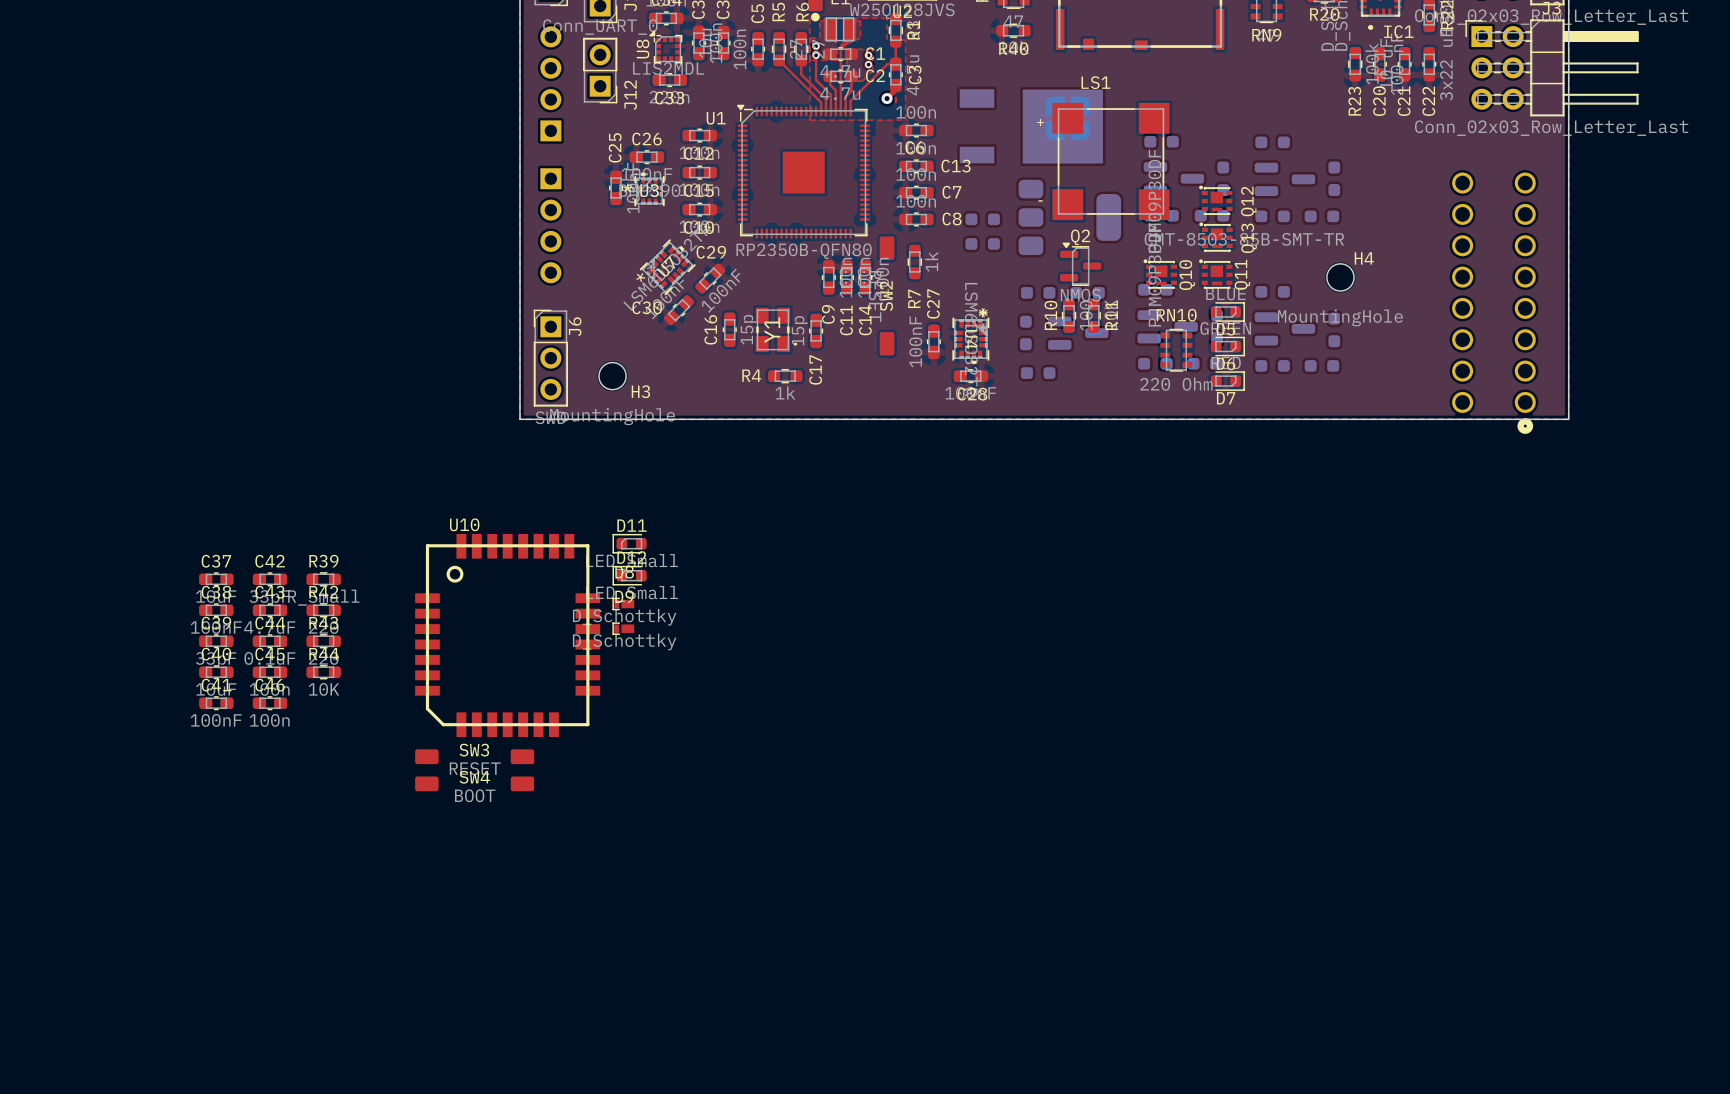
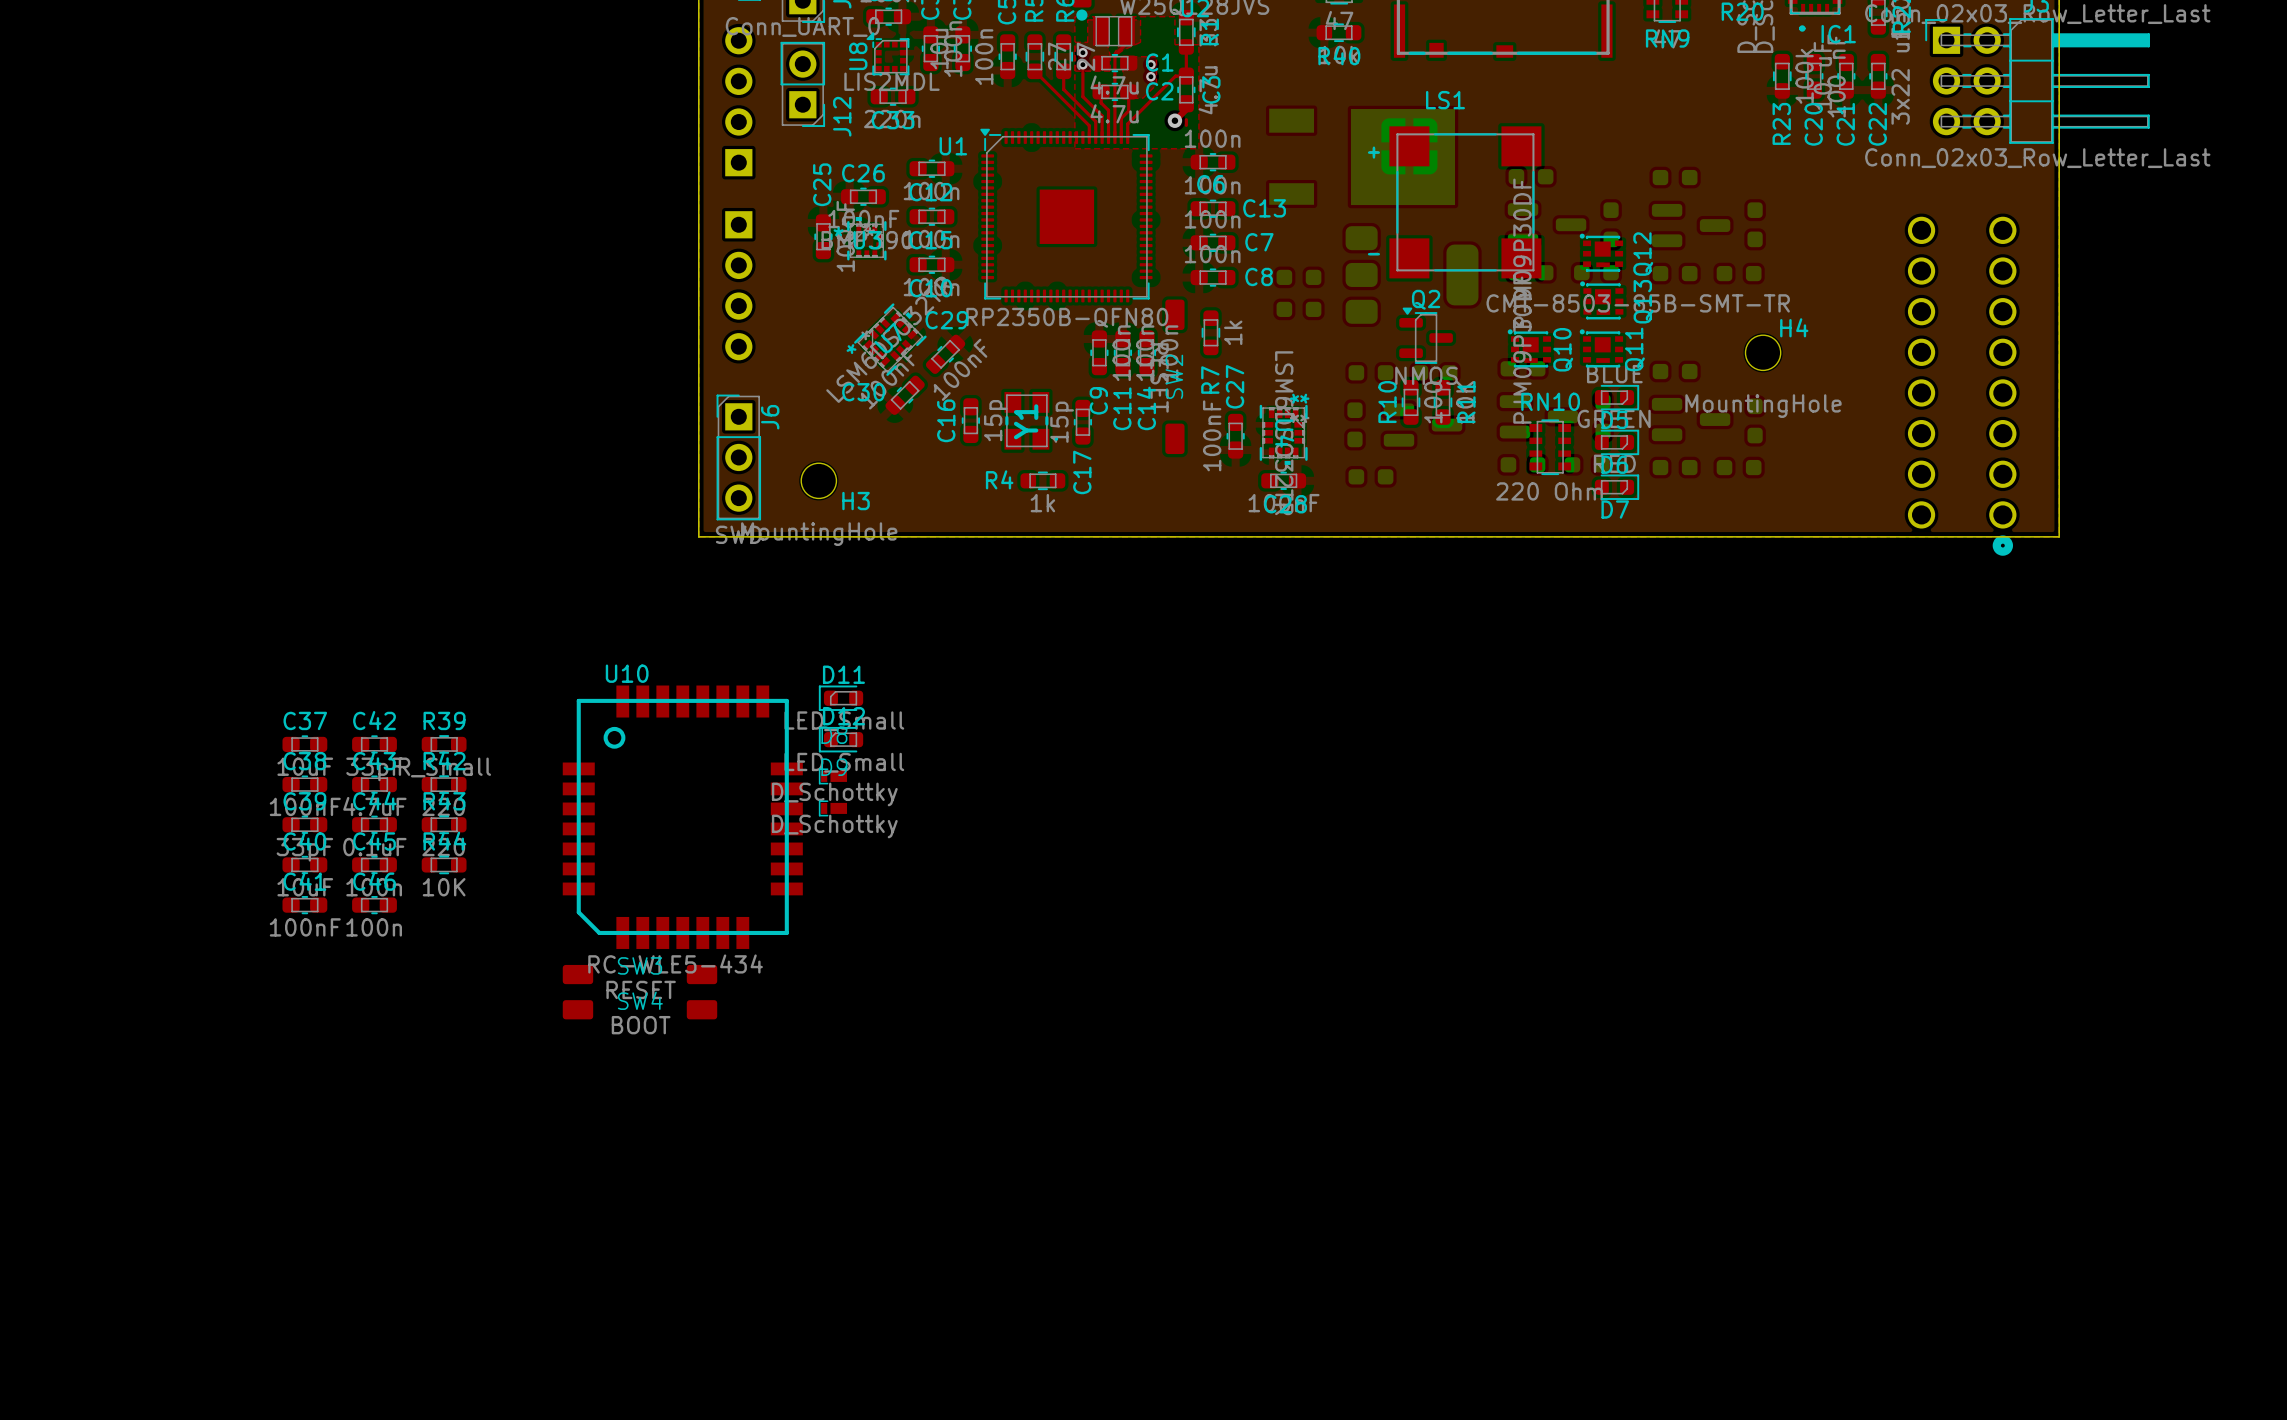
U10 value: none -> RC-WLE5-434 (675, 963)

